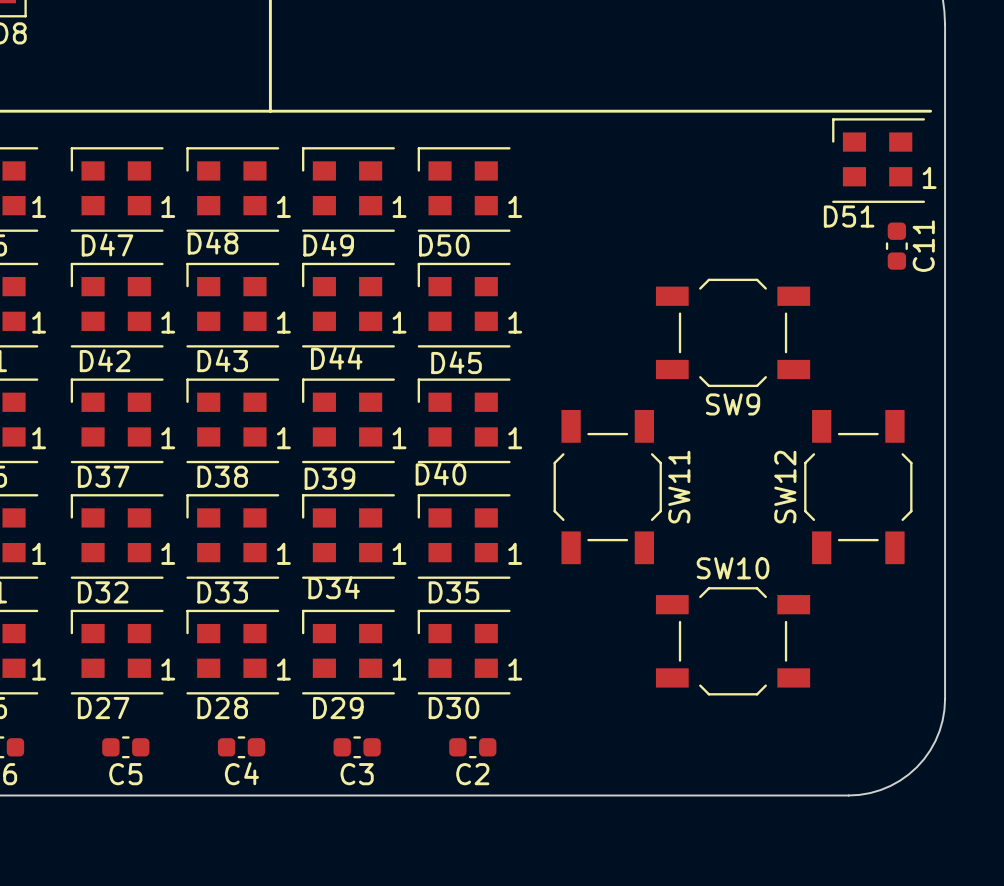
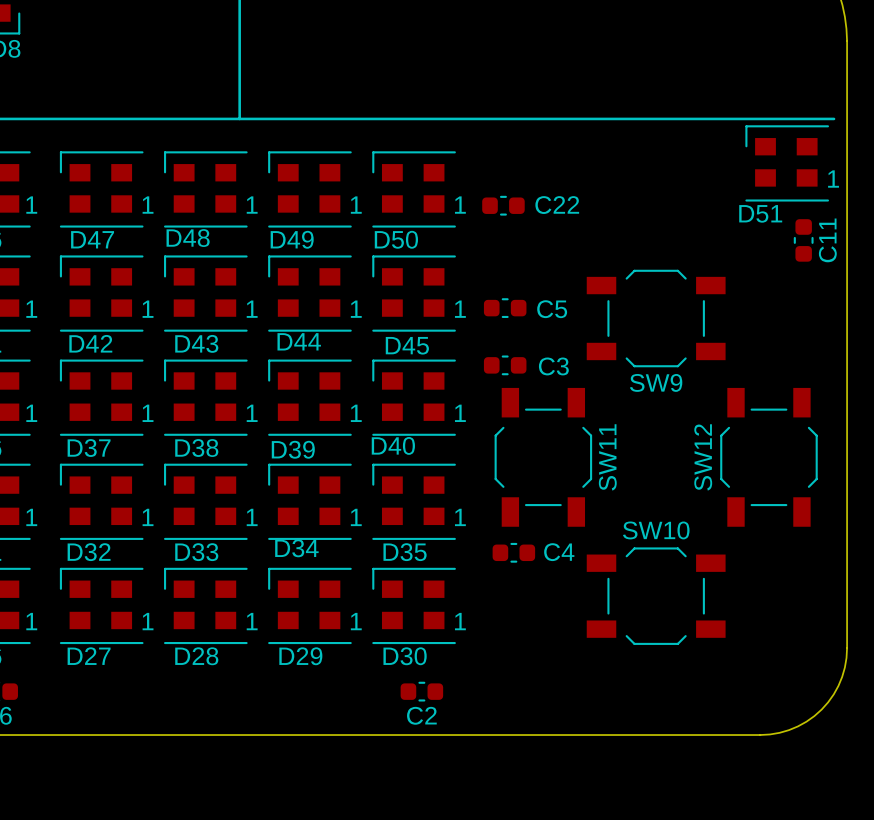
C22: none -> (503, 205)
C5 position: (125, 747) -> (505, 308)
C4 position: (241, 747) -> (513, 552)
C3 position: (357, 747) -> (505, 365)
C4 name position: C4 (241, 773) -> C4 (559, 552)
C5 name position: C5 (125, 774) -> C5 (552, 309)
C3 name position: C3 (357, 774) -> C3 (553, 366)

